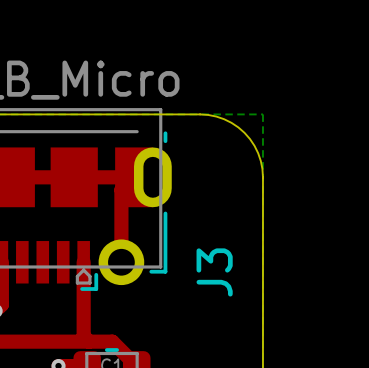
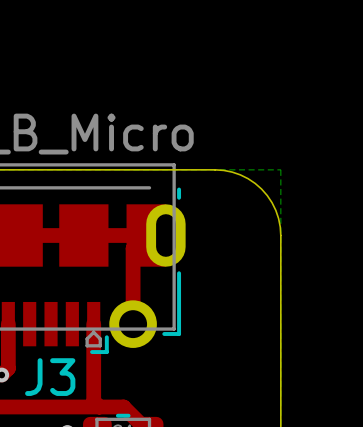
J3 name rotation: 0° (214, 272) -> 90° clockwise (50, 377)
J3 name position: J3 (214, 272) -> J3 (50, 377)

